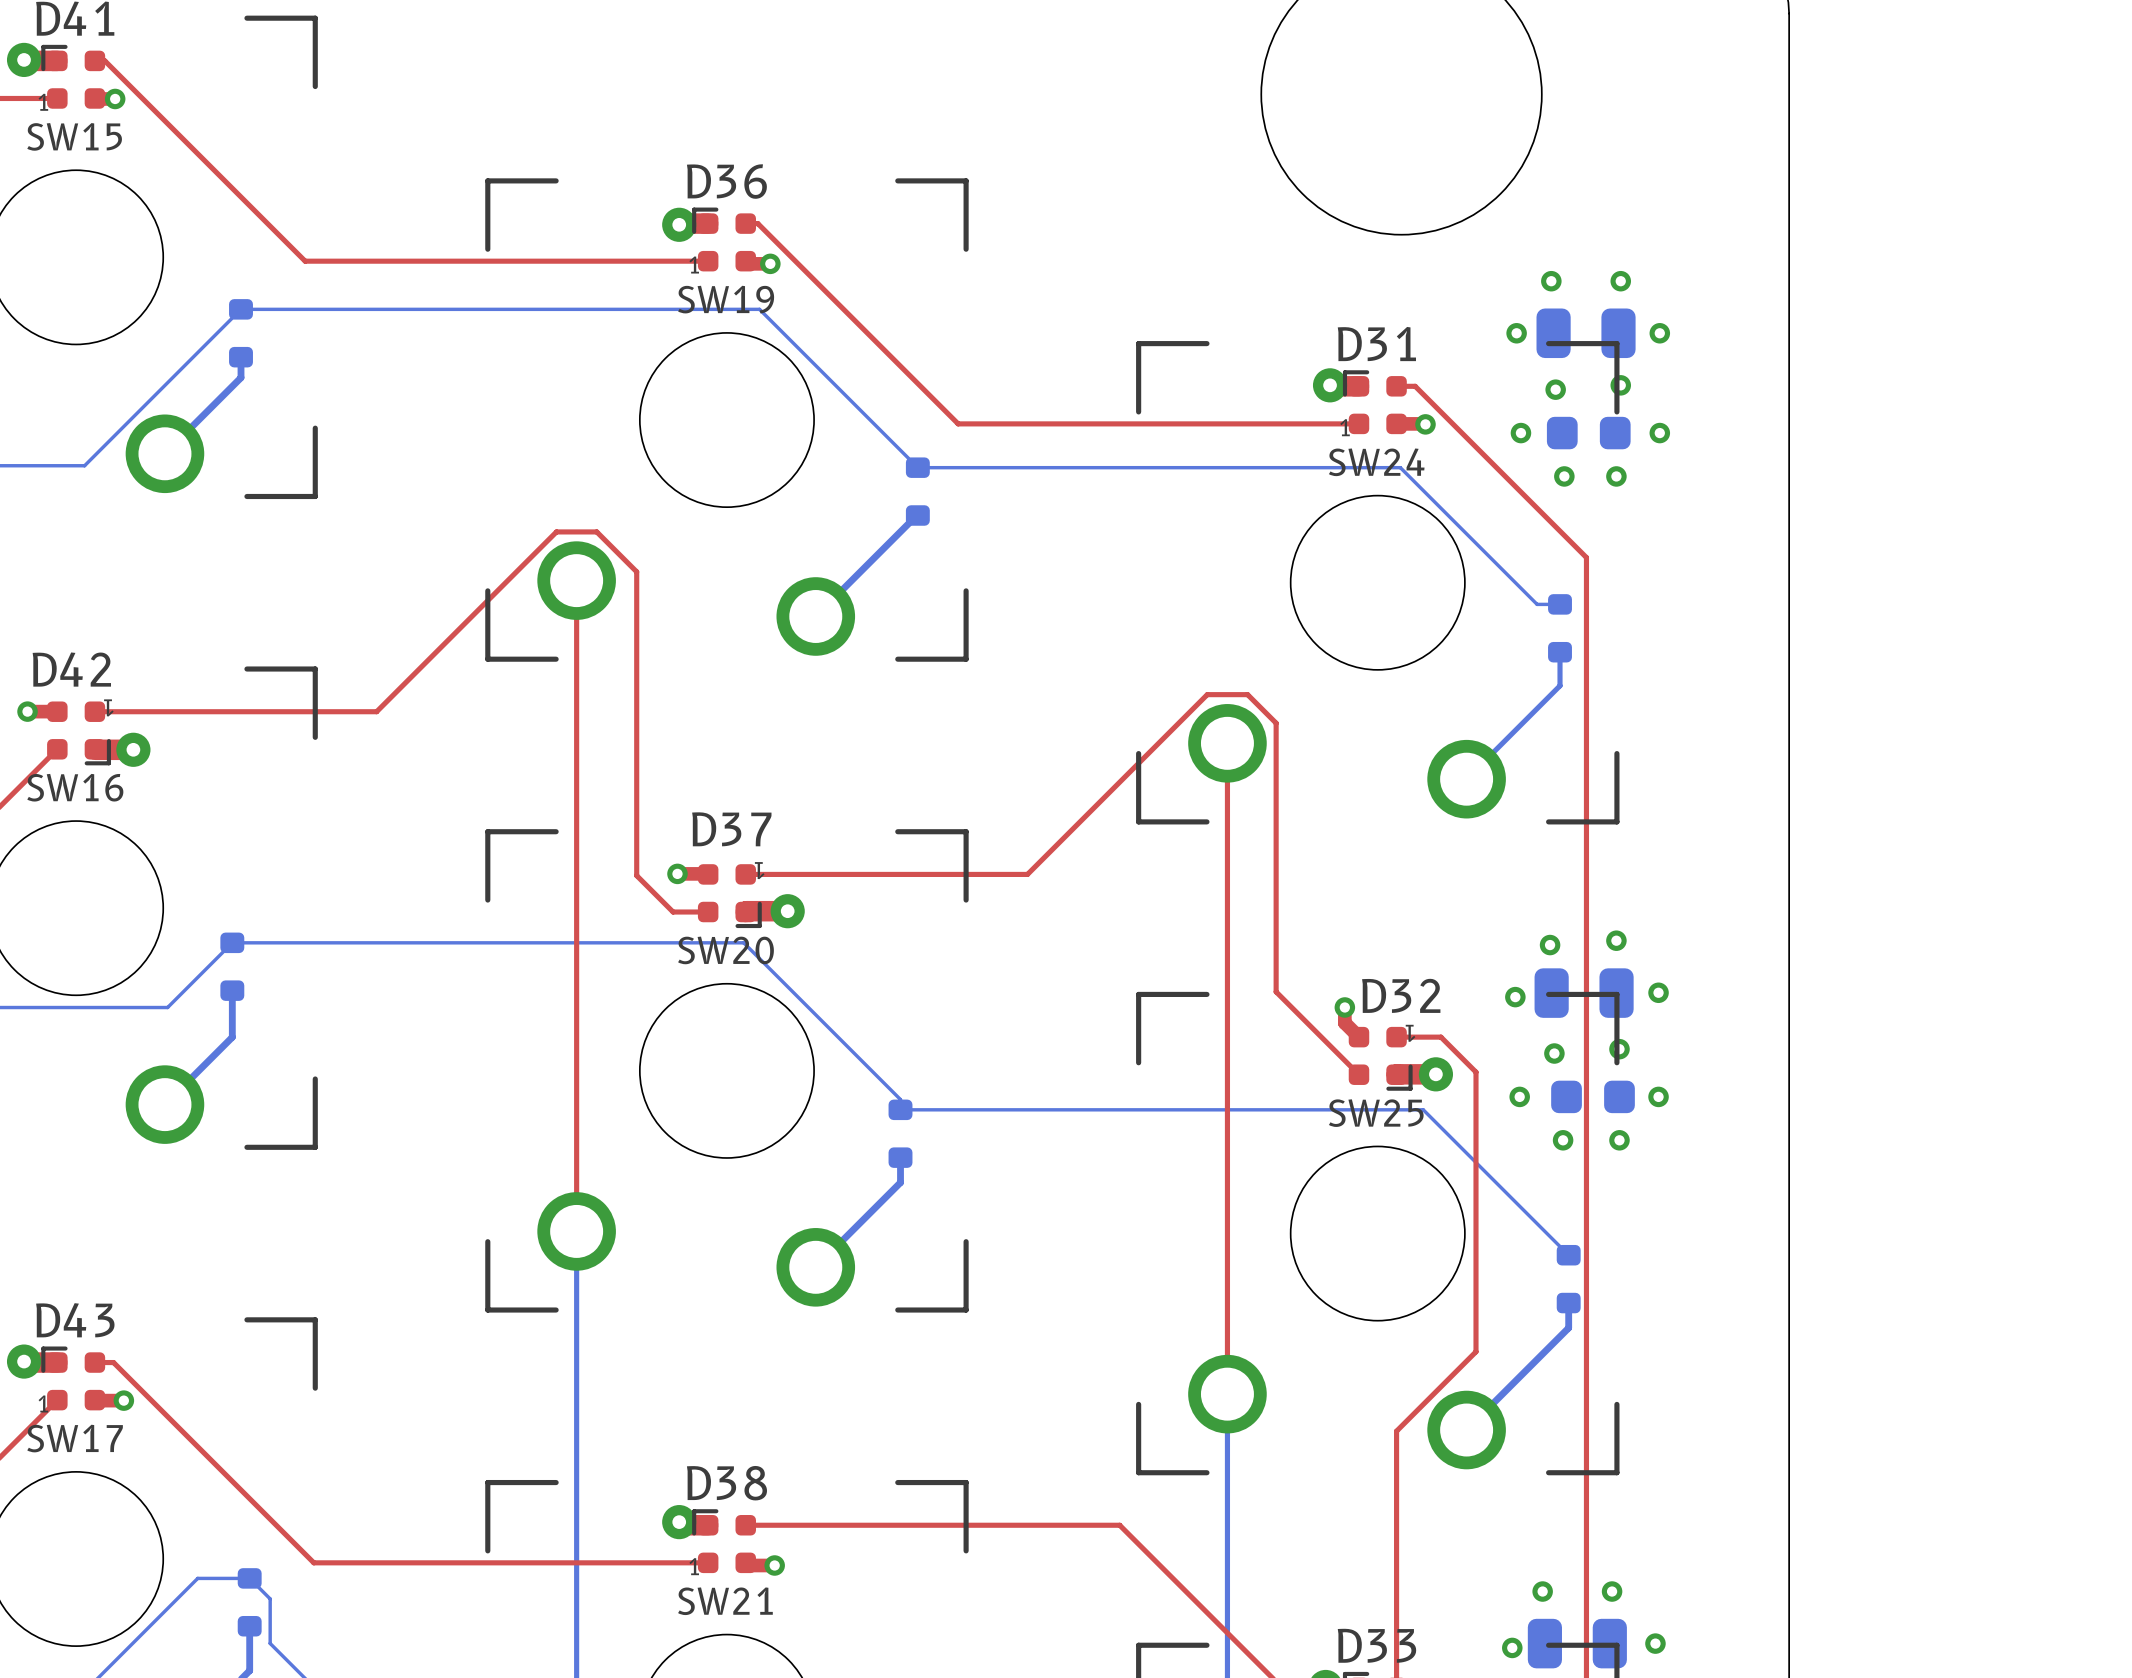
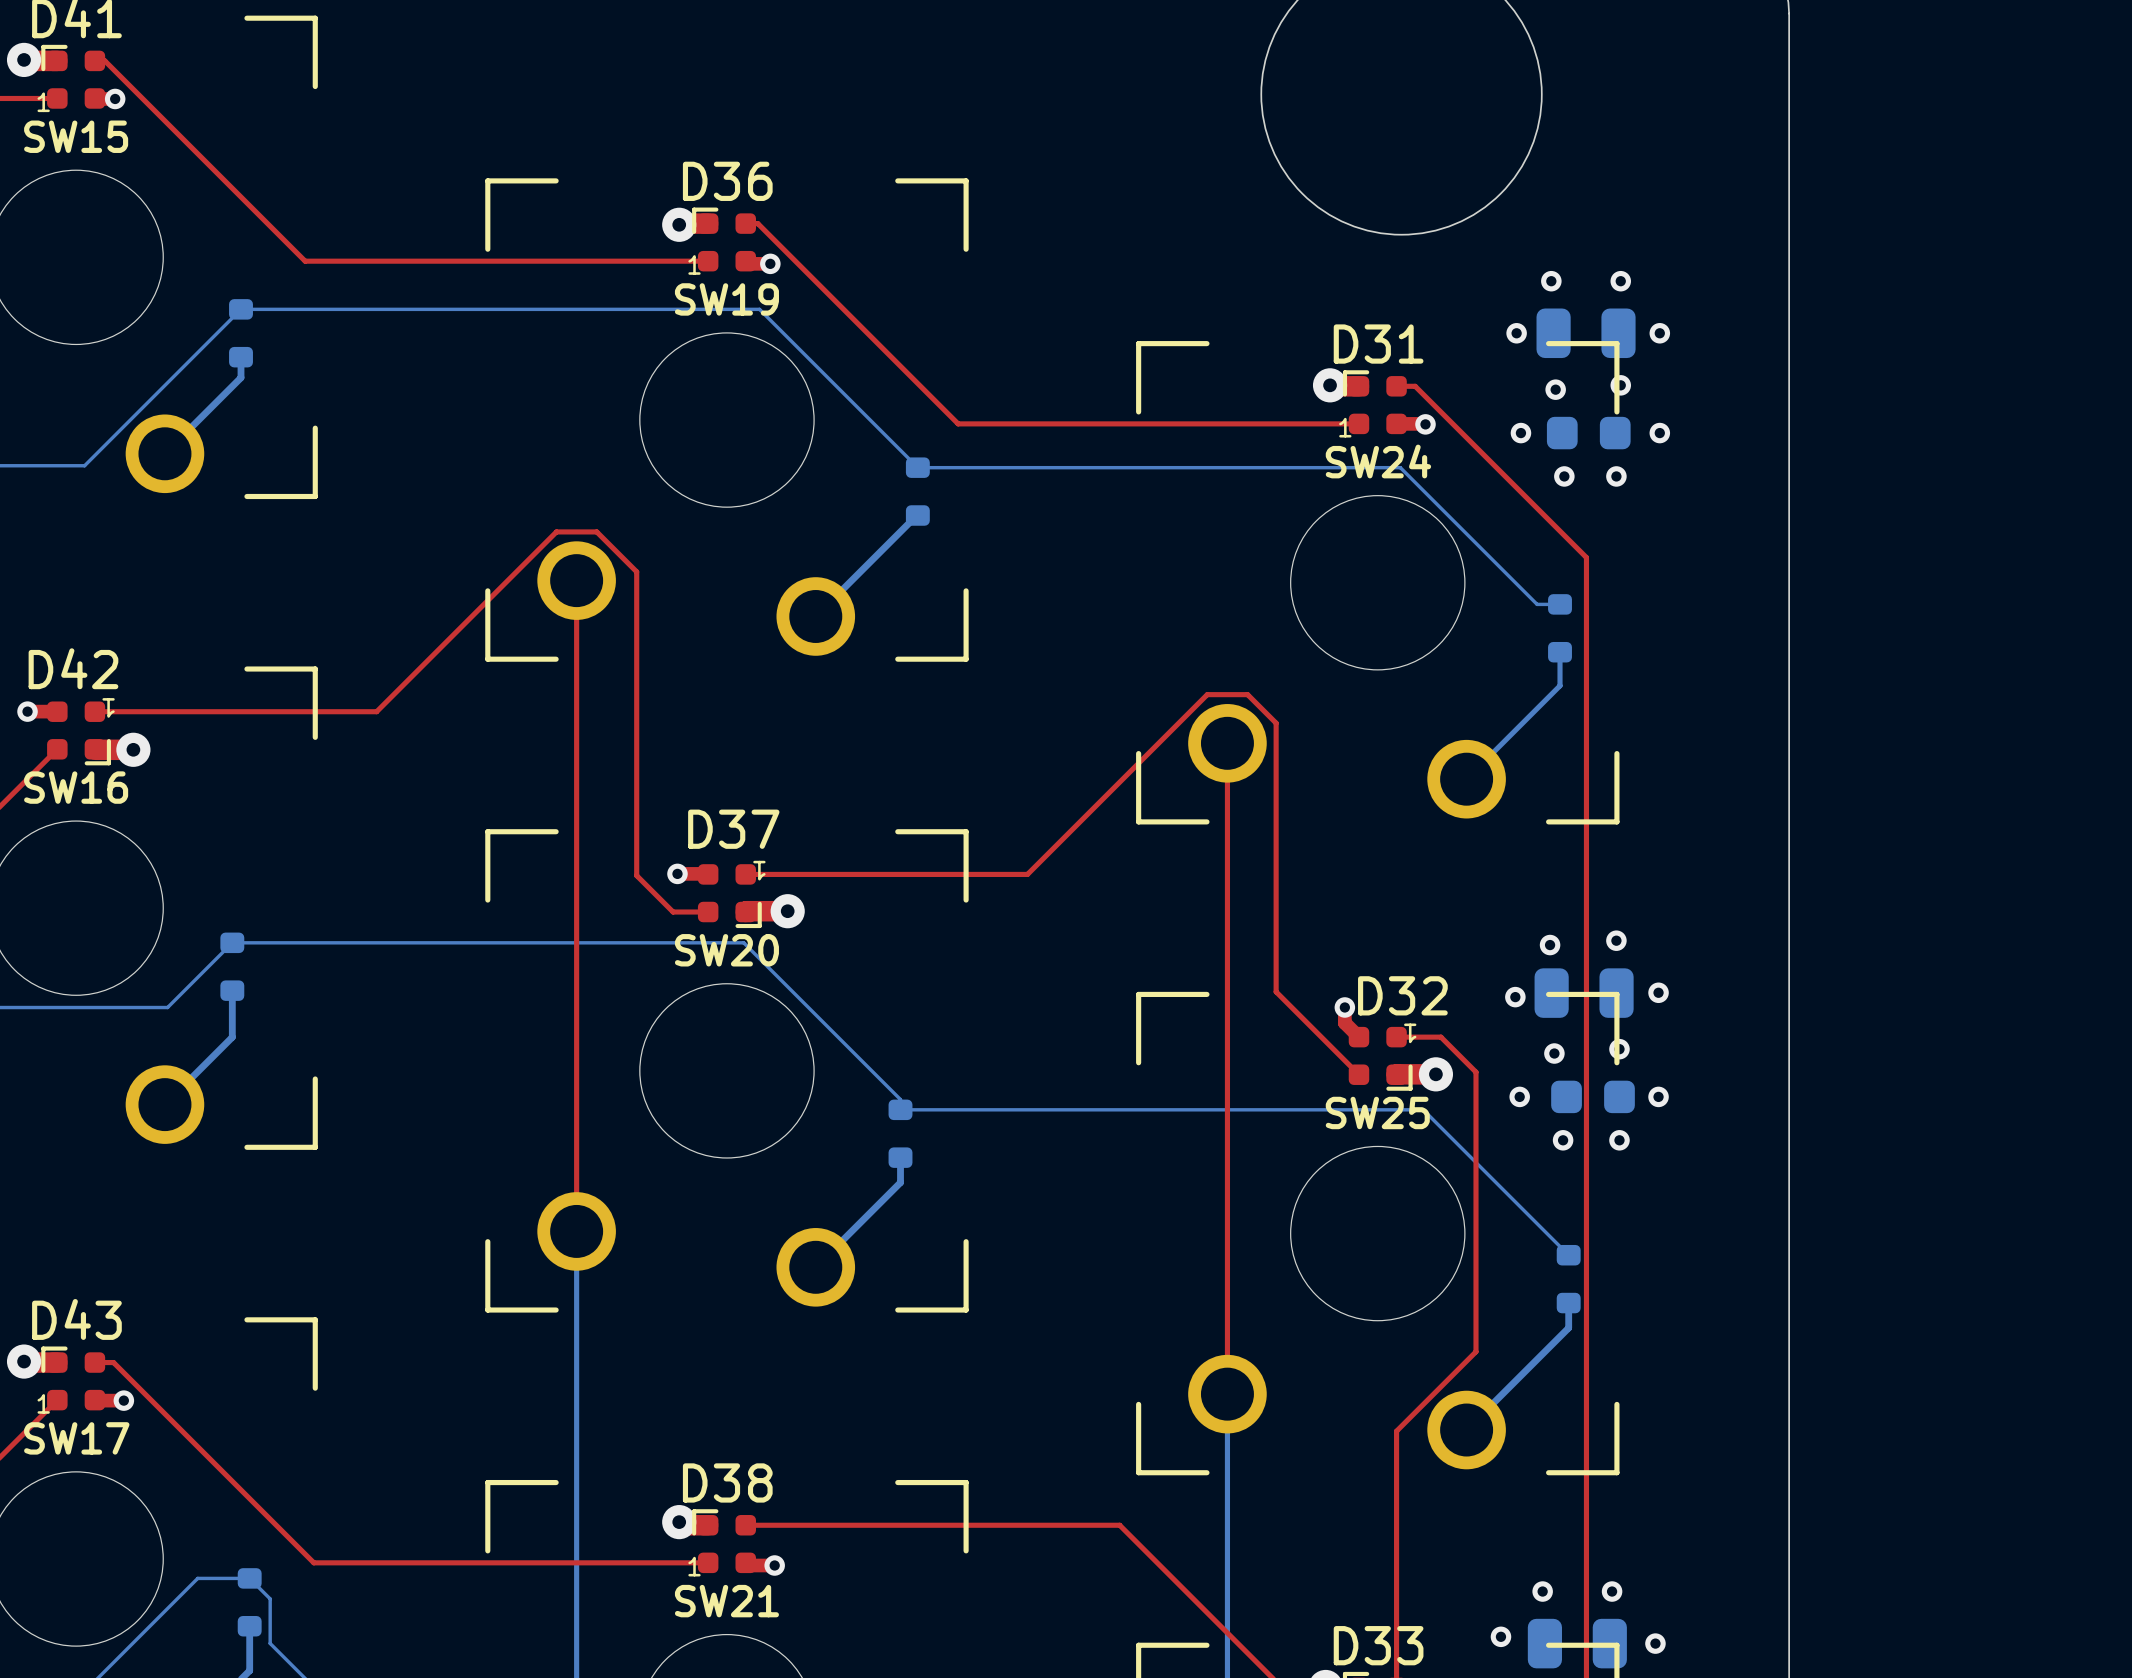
via position: (1512, 1647) -> (1500, 1636)

